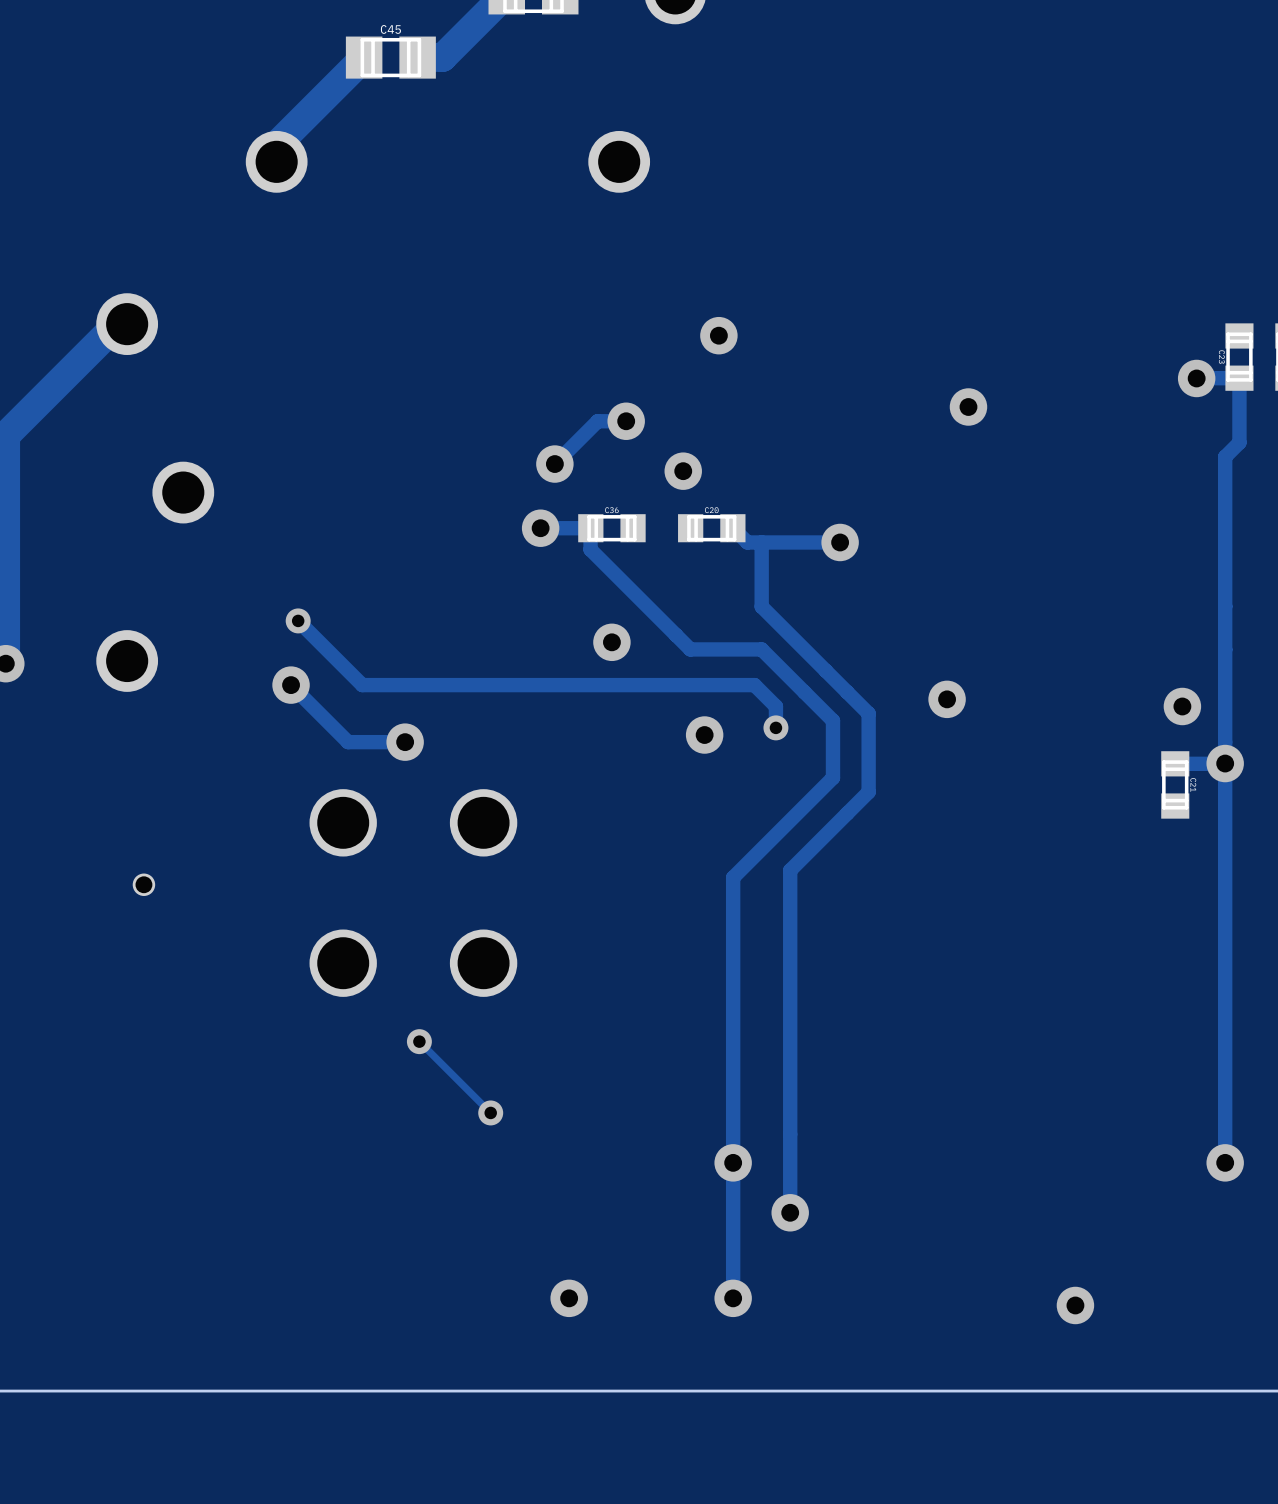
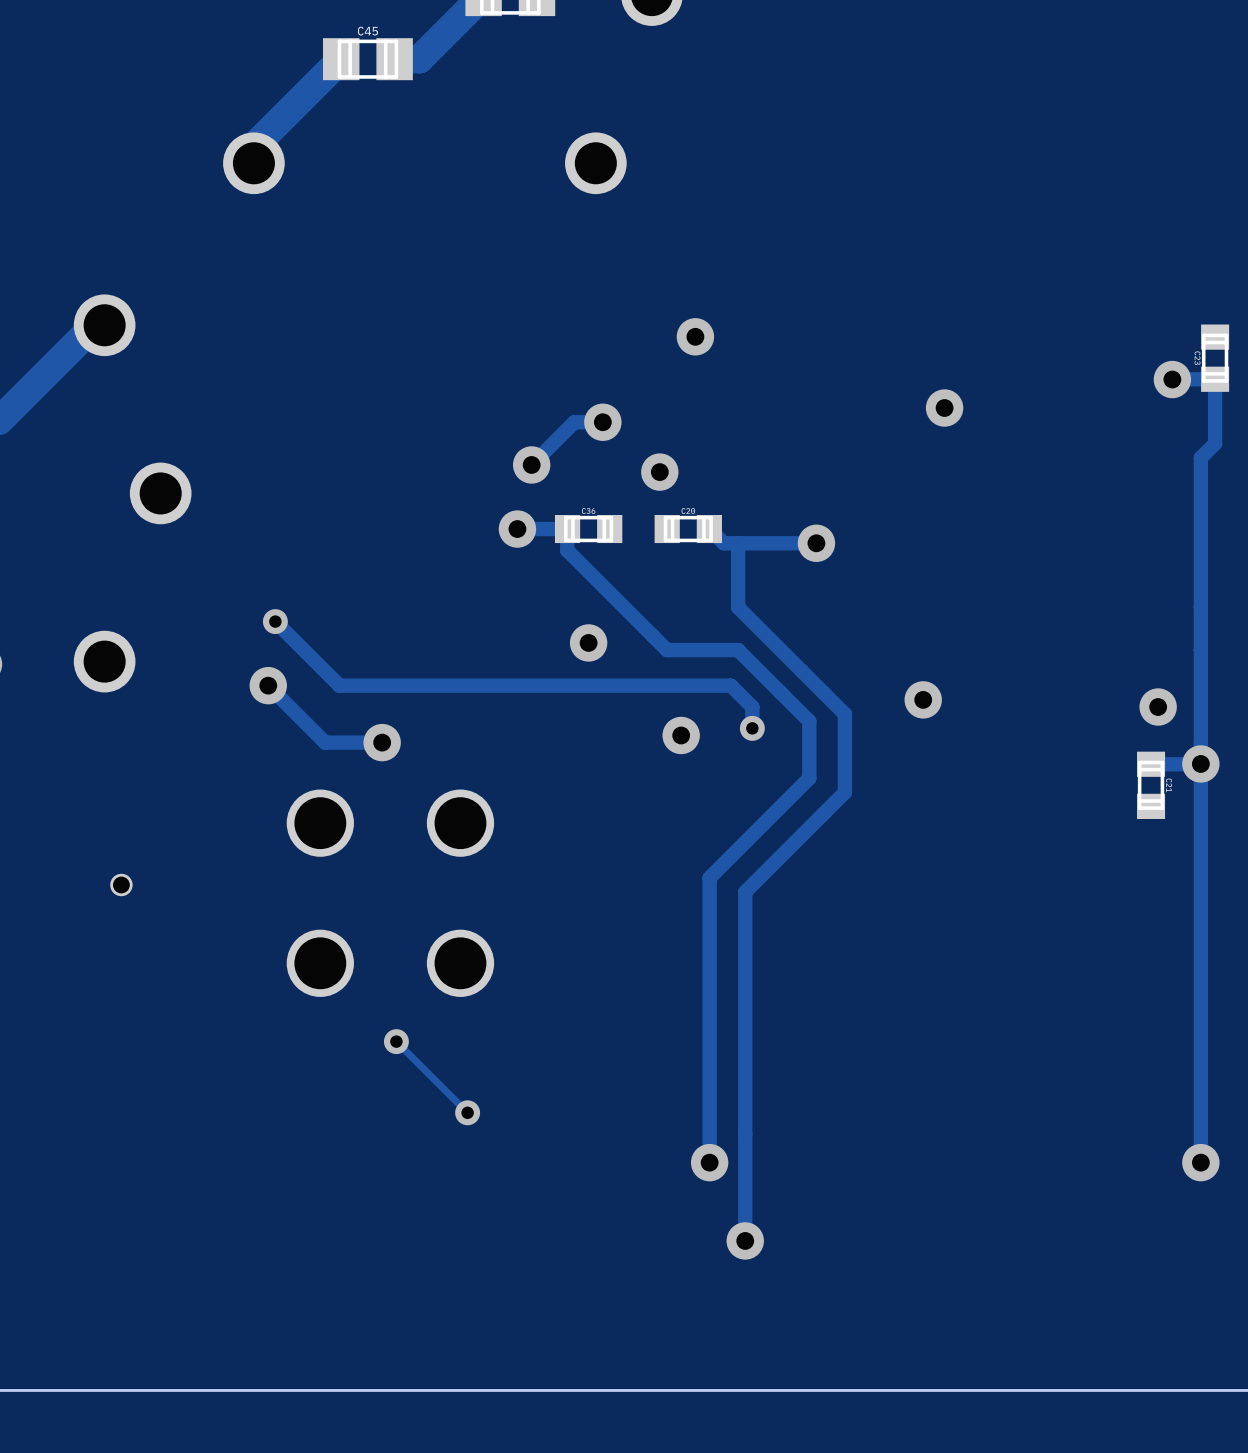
track: (790, 870) (790, 1212) -> (766, 870) (745, 892) (745, 1240)
track: (733, 1162) (733, 1298) -> none
via: (790, 1212) -> none
via: none -> (745, 1240)
via: (569, 1298) -> none
via: (733, 1298) -> none
via: (1075, 1305) -> none

